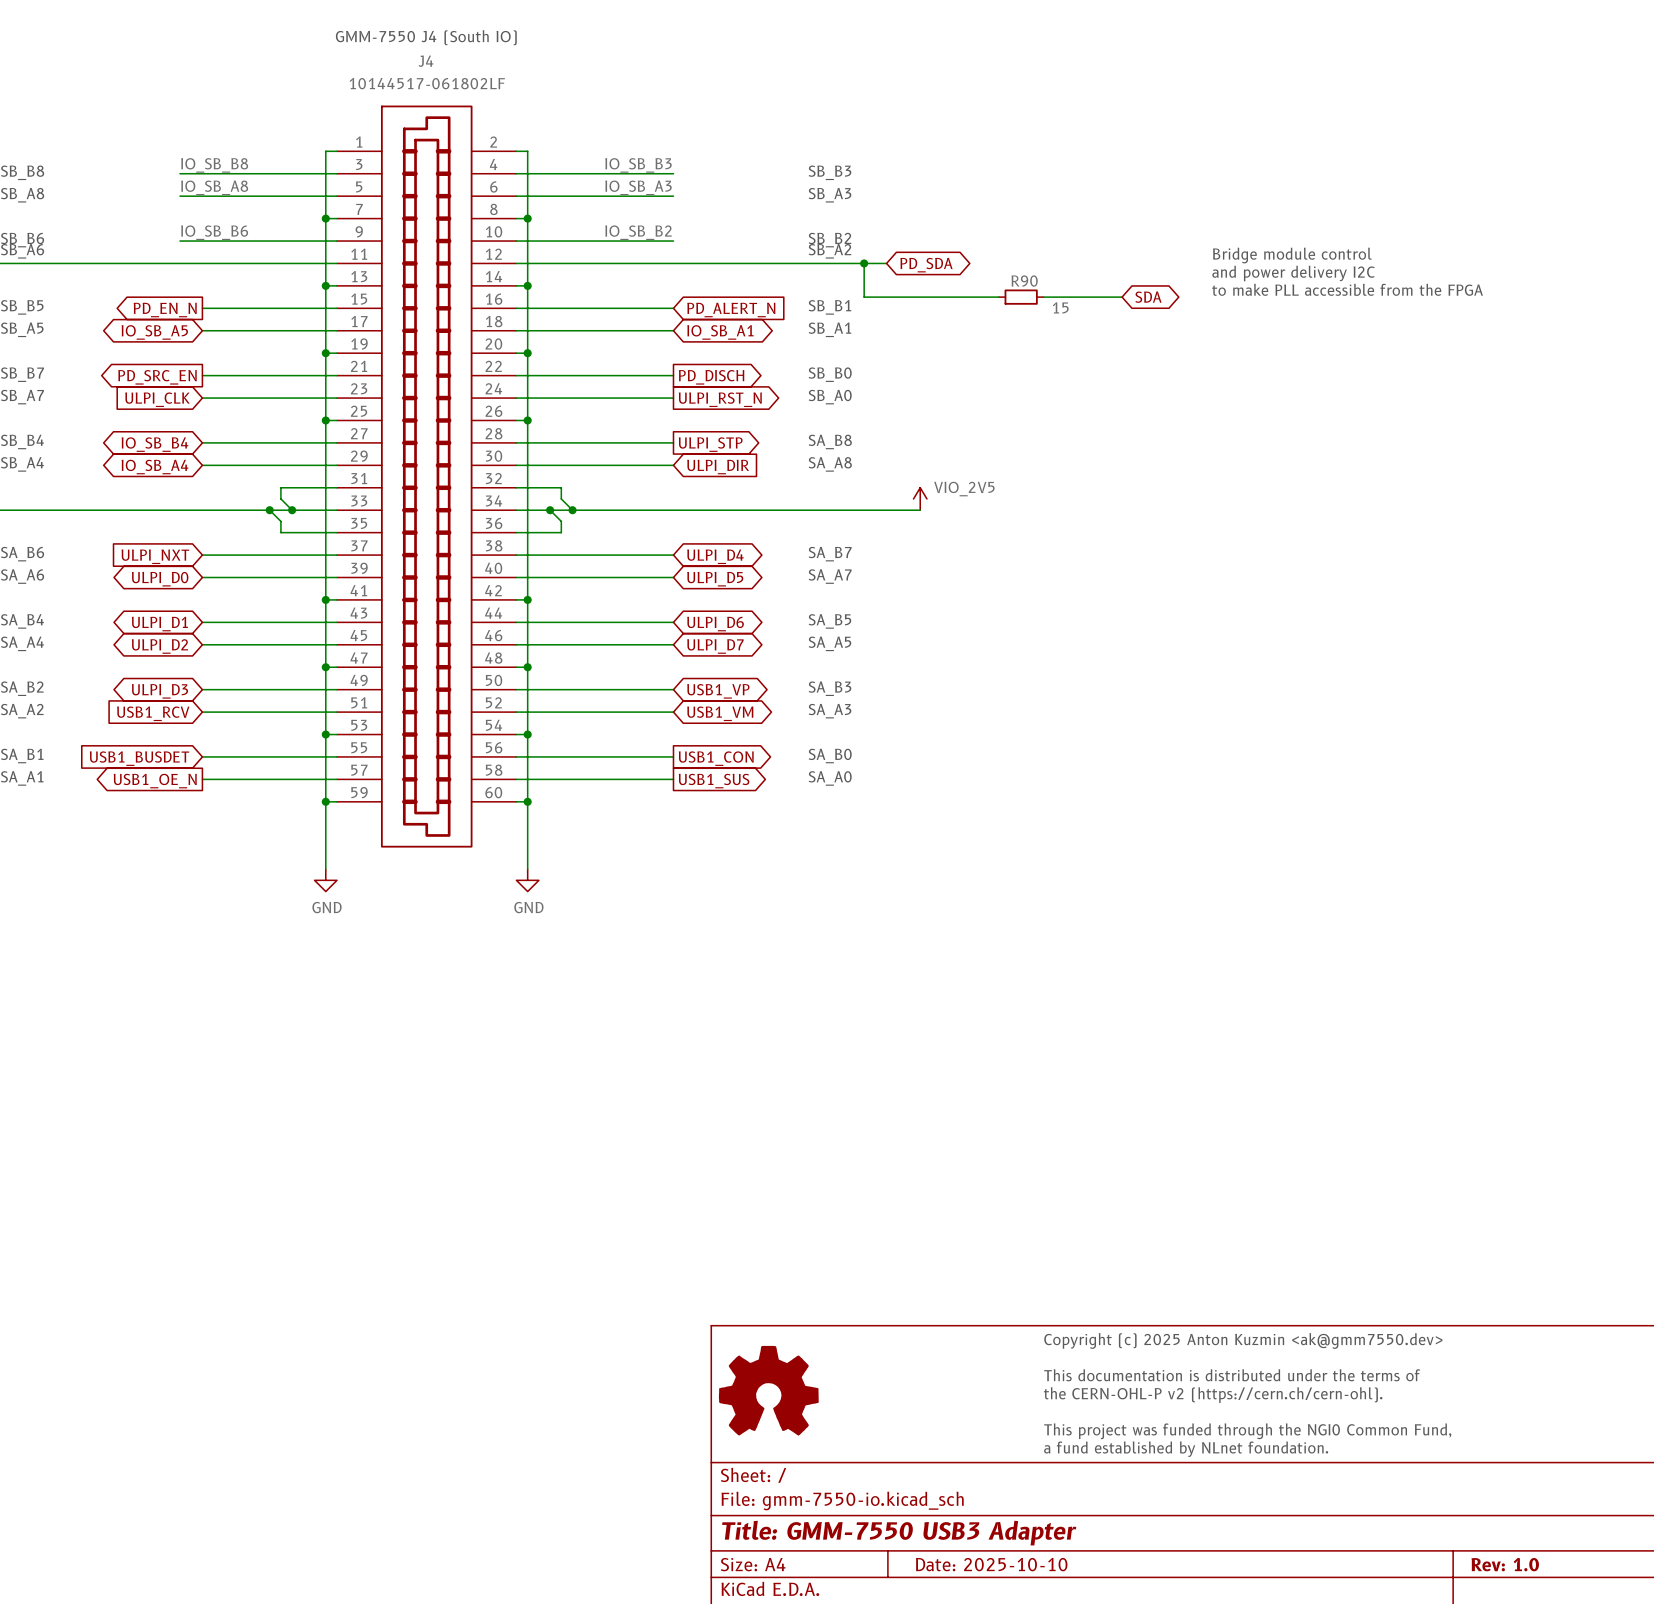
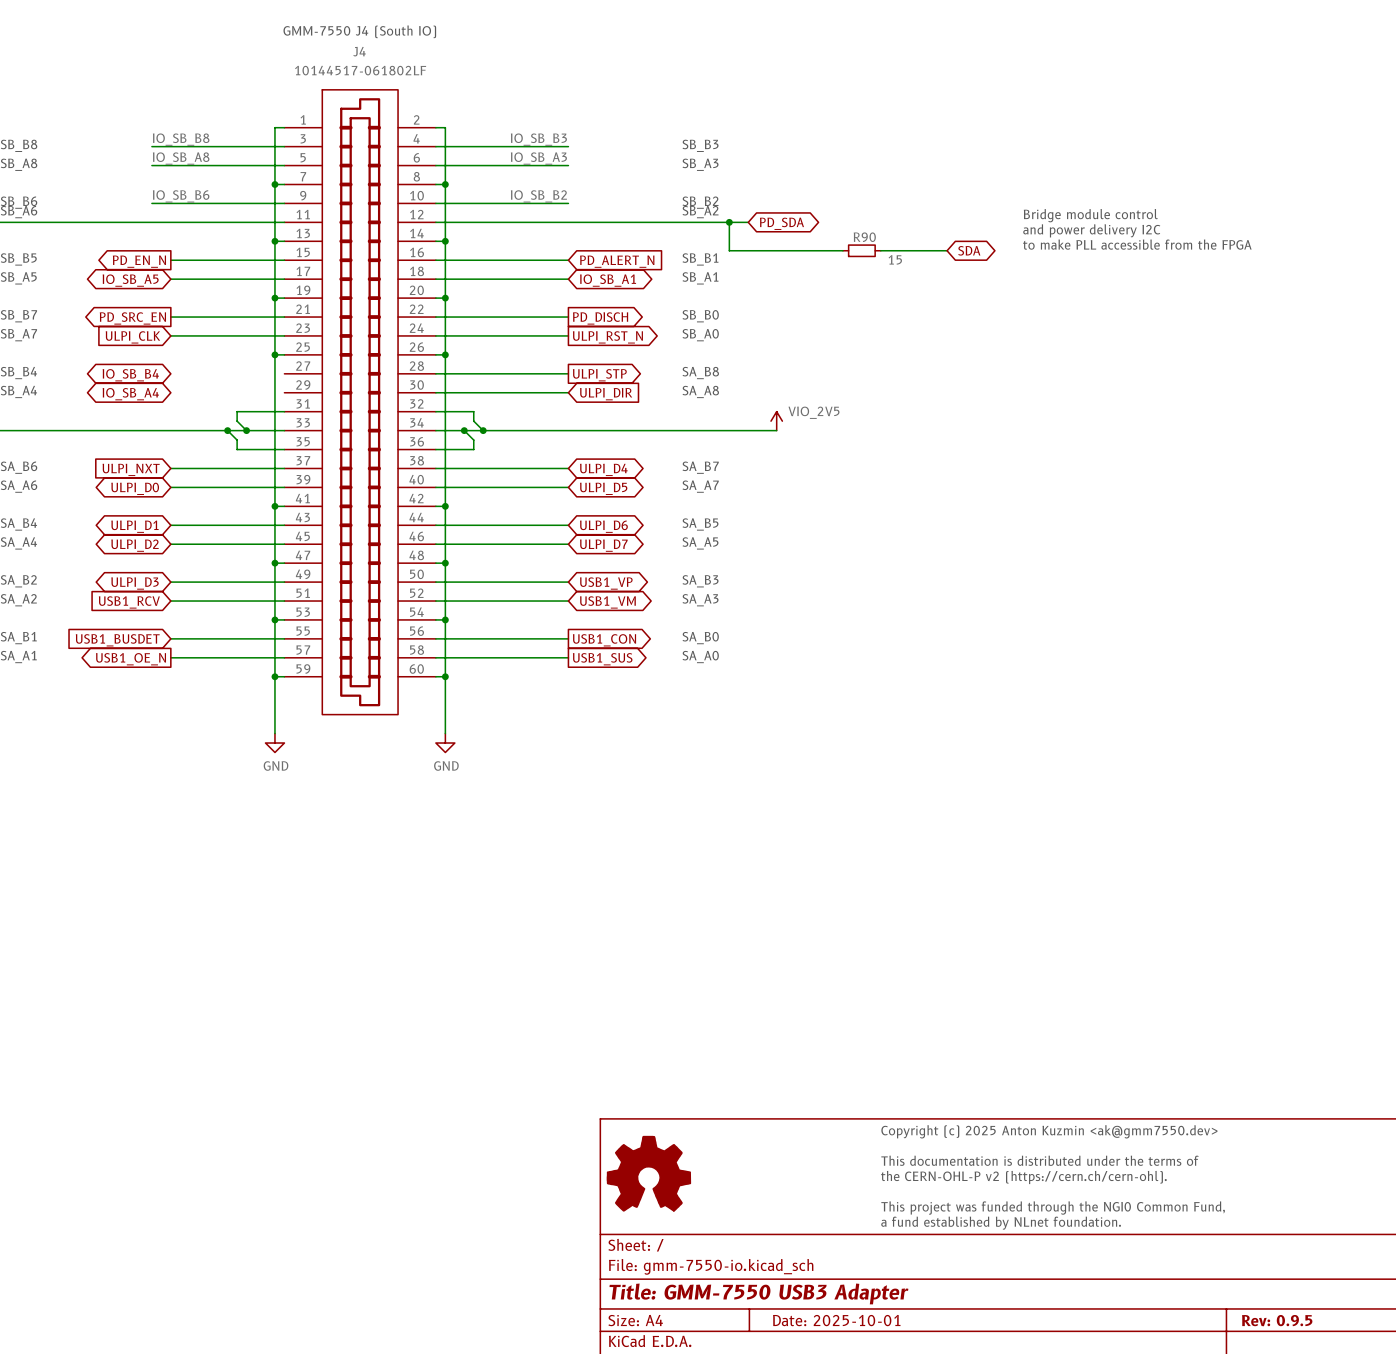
wire: (202, 442) (337, 442) -> none
wire: (202, 465) (337, 465) -> none
title block: Date: 2025-10-10 (991, 1564) -> Date: 2025-10-01 (836, 1320)
title block: Rev: 1.0 (1505, 1564) -> Rev: 0.9.5 (1277, 1320)

